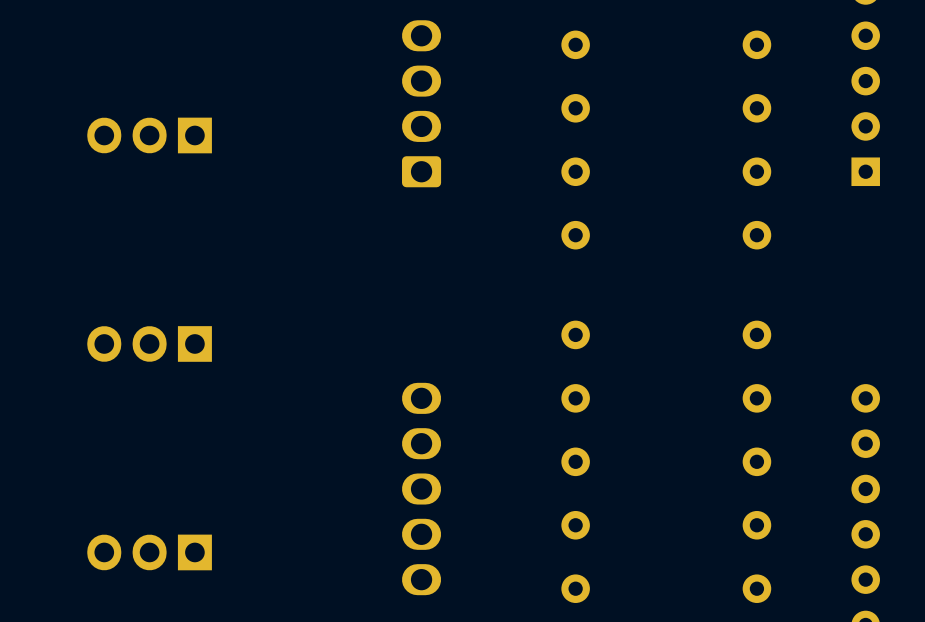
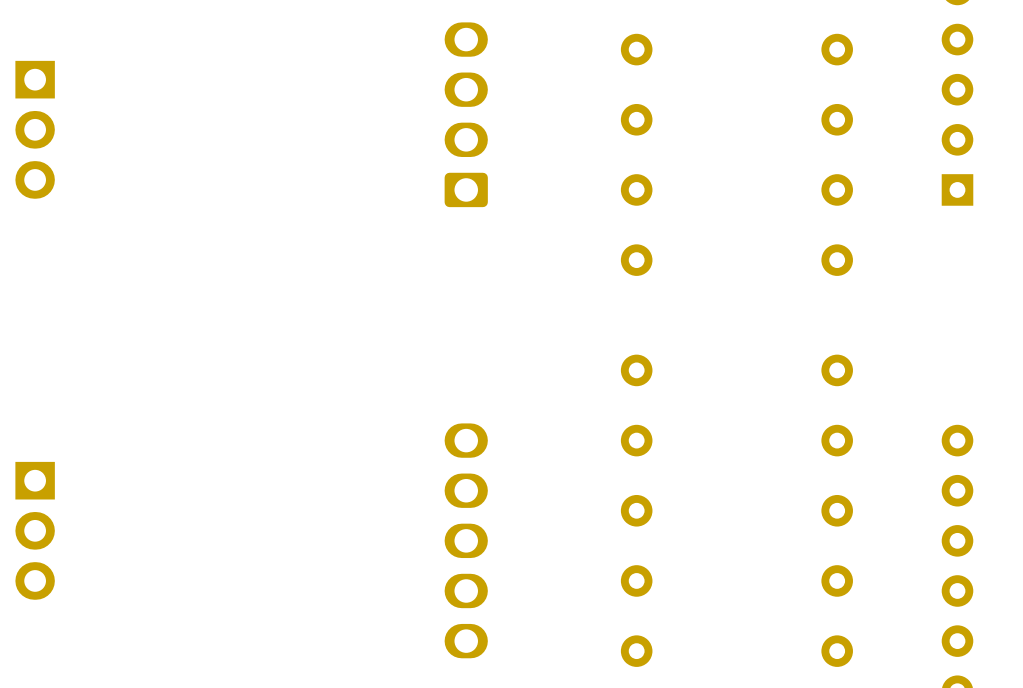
part rotation: 0° (149, 135) -> 90° counterclockwise (35, 129)
part position: (149, 135) -> (35, 129)
part: (149, 343) -> none
part: none -> (35, 530)
part: (149, 552) -> none

